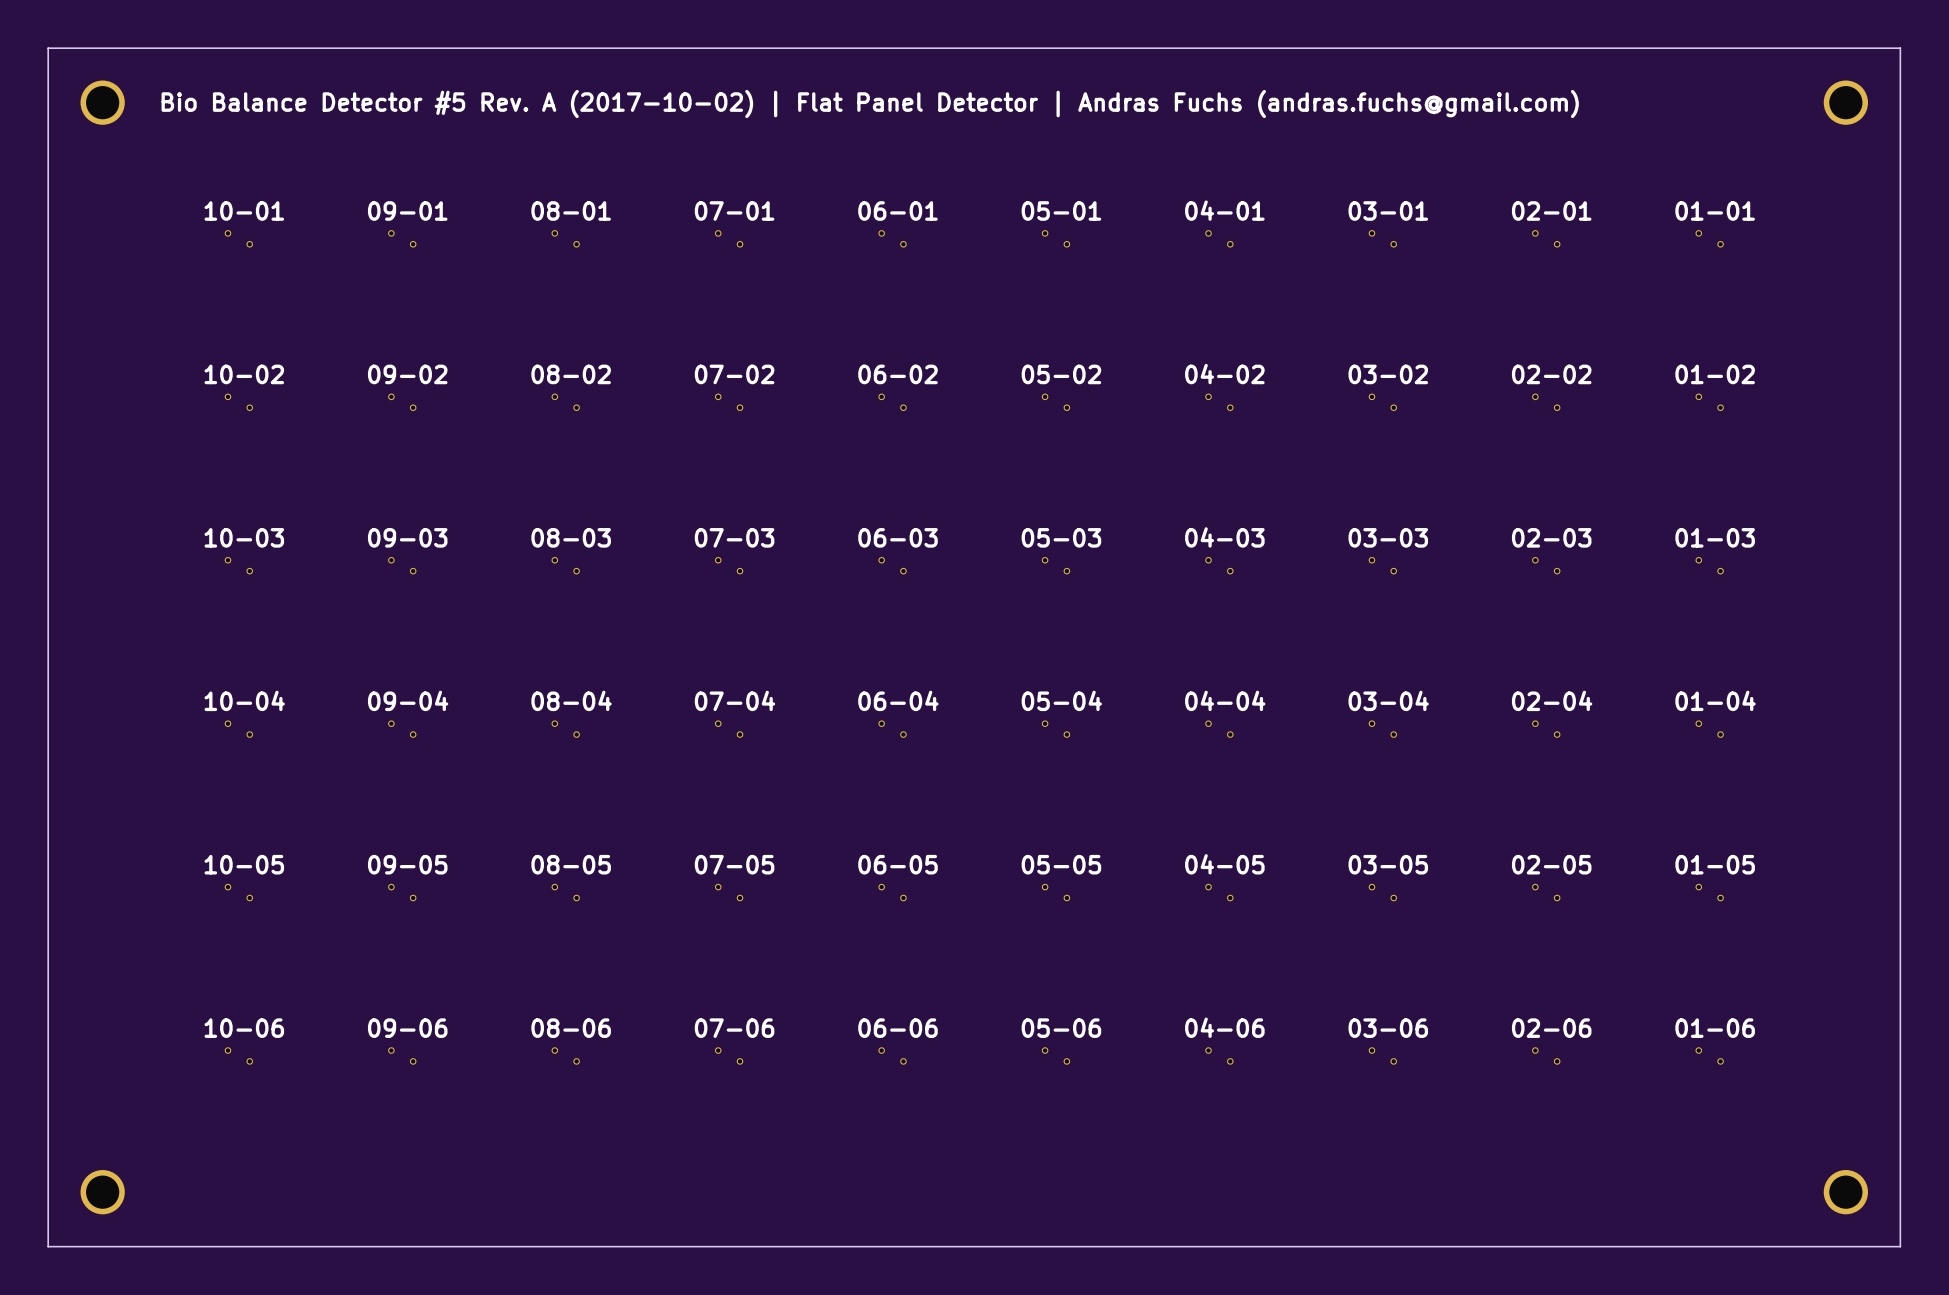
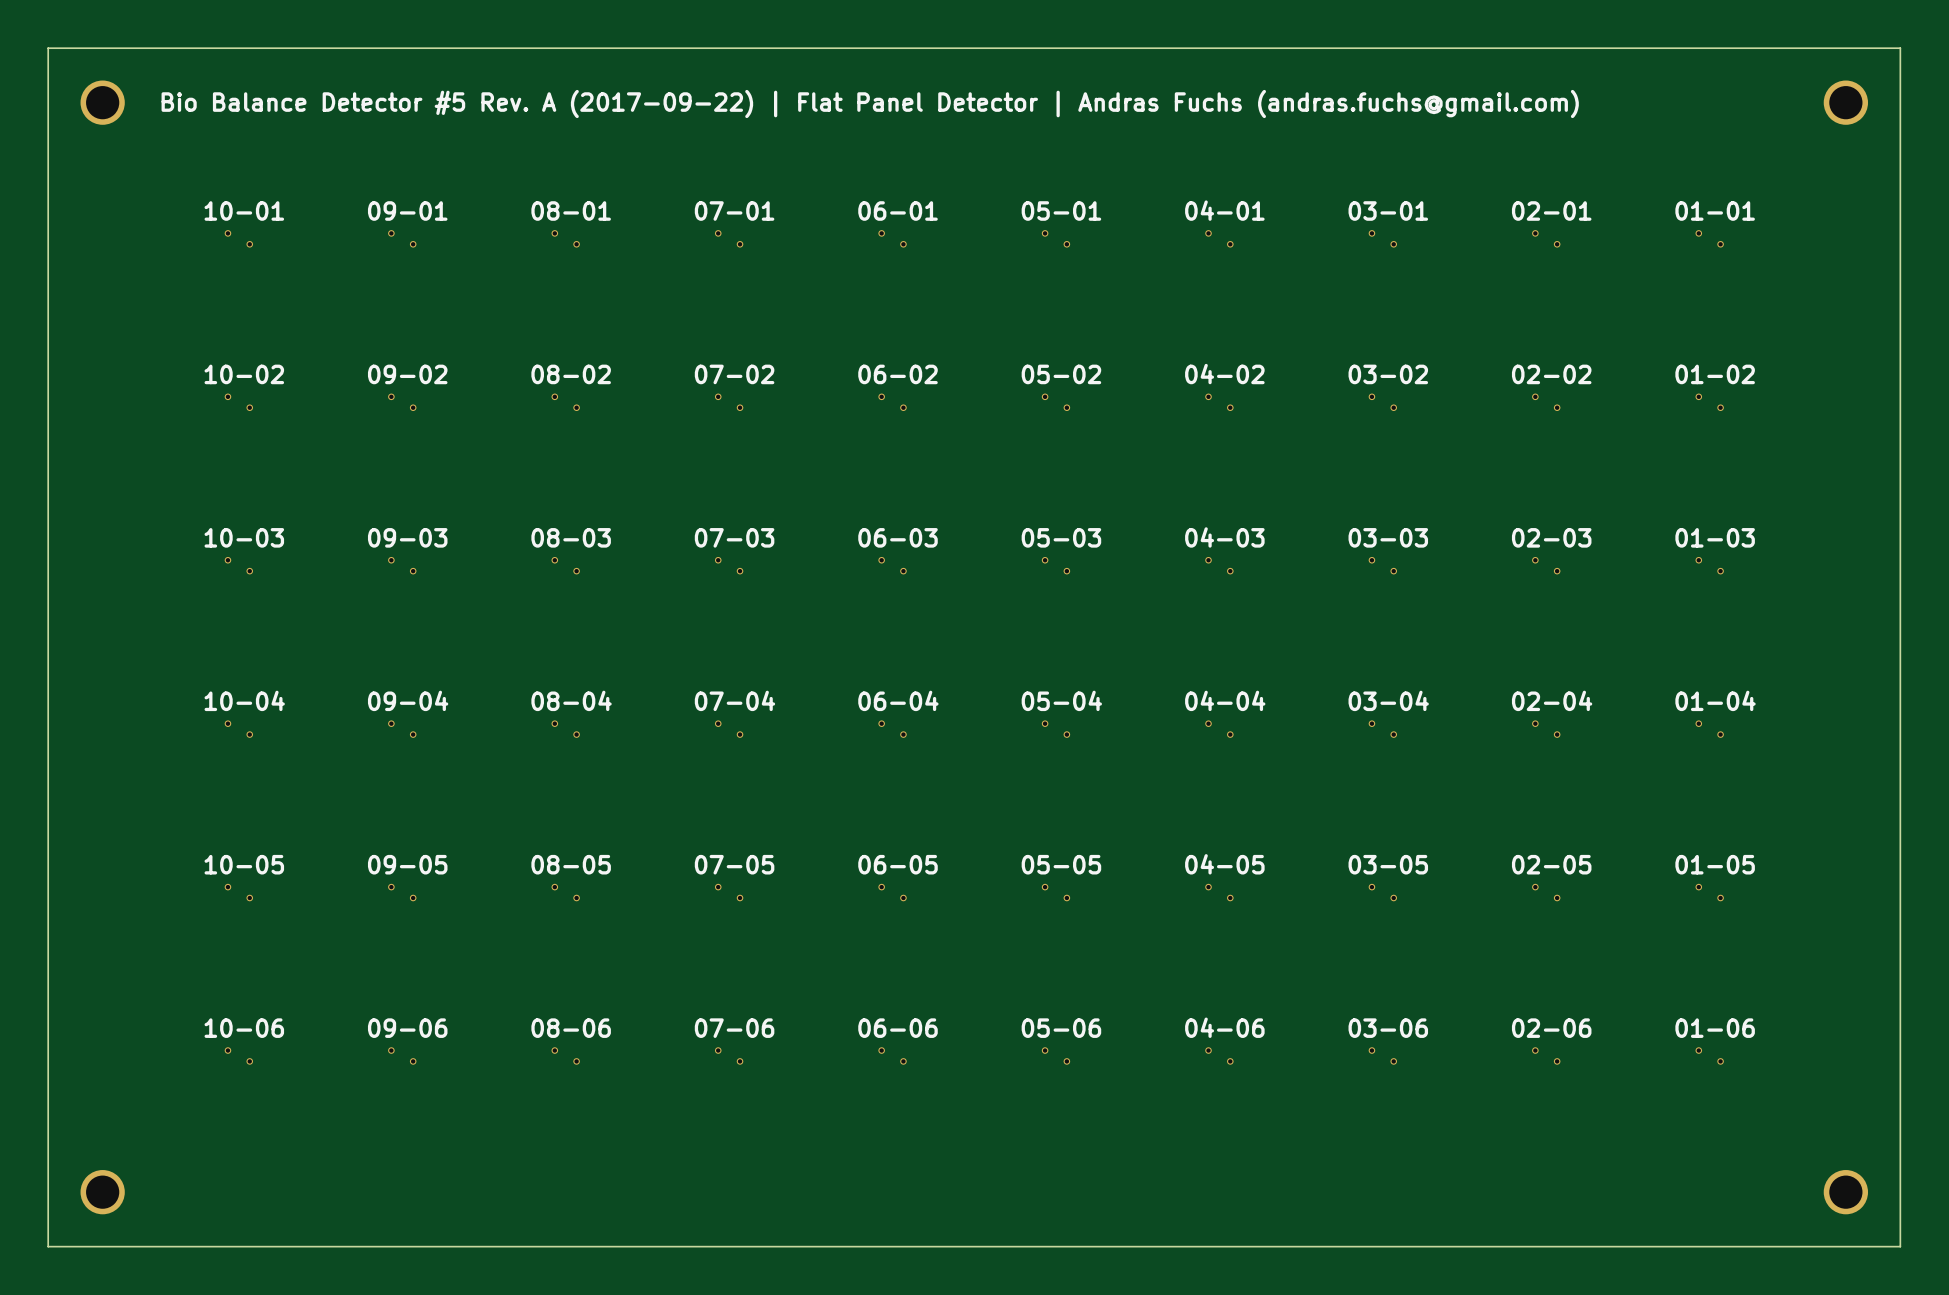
text: Bio Balance Detector #5 Rev. A (2017-10-02) | Flat Panel Detector | Andras Fuchs (andras.fuchs@gmail.com) (870, 103) -> Bio Balance Detector #5 Rev. A (2017-09-22) | Flat Panel Detector | Andras Fuchs (andras.fuchs@gmail.com) (870, 103)

